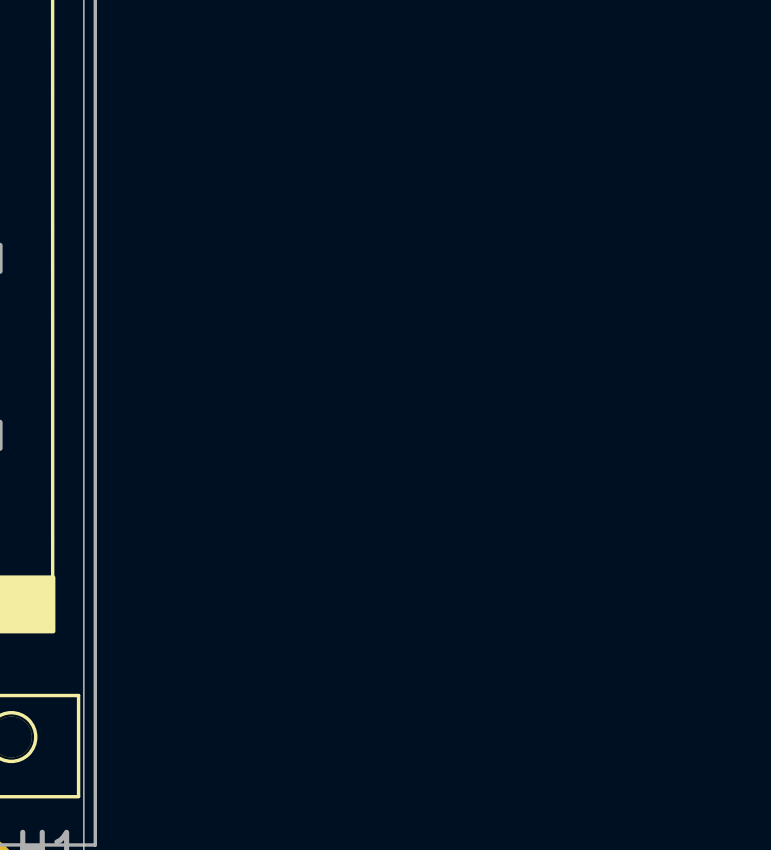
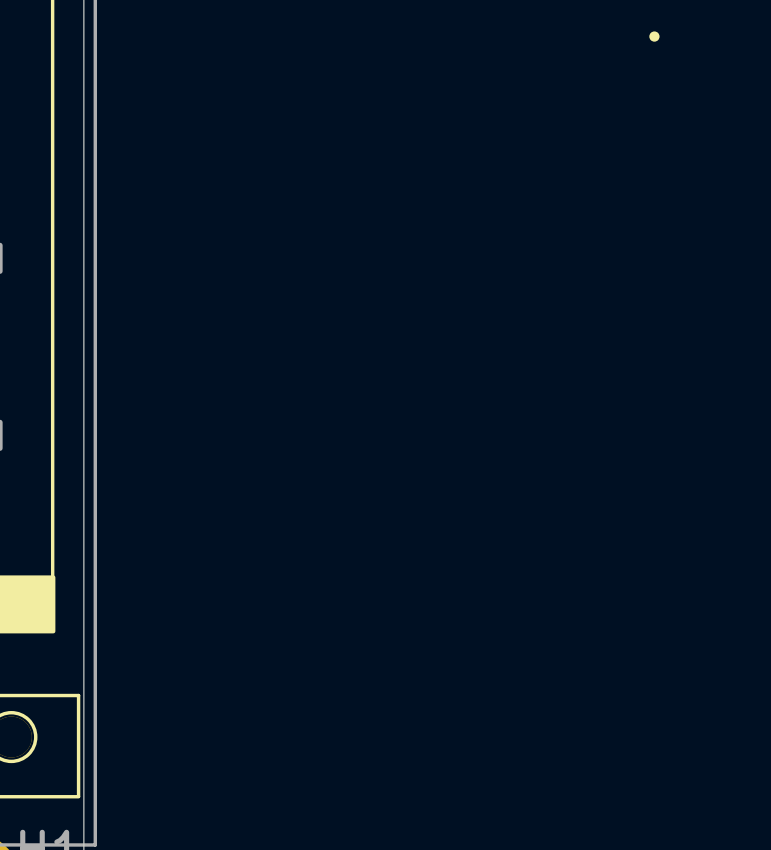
drawing: none -> [649, 31, 660, 42]

